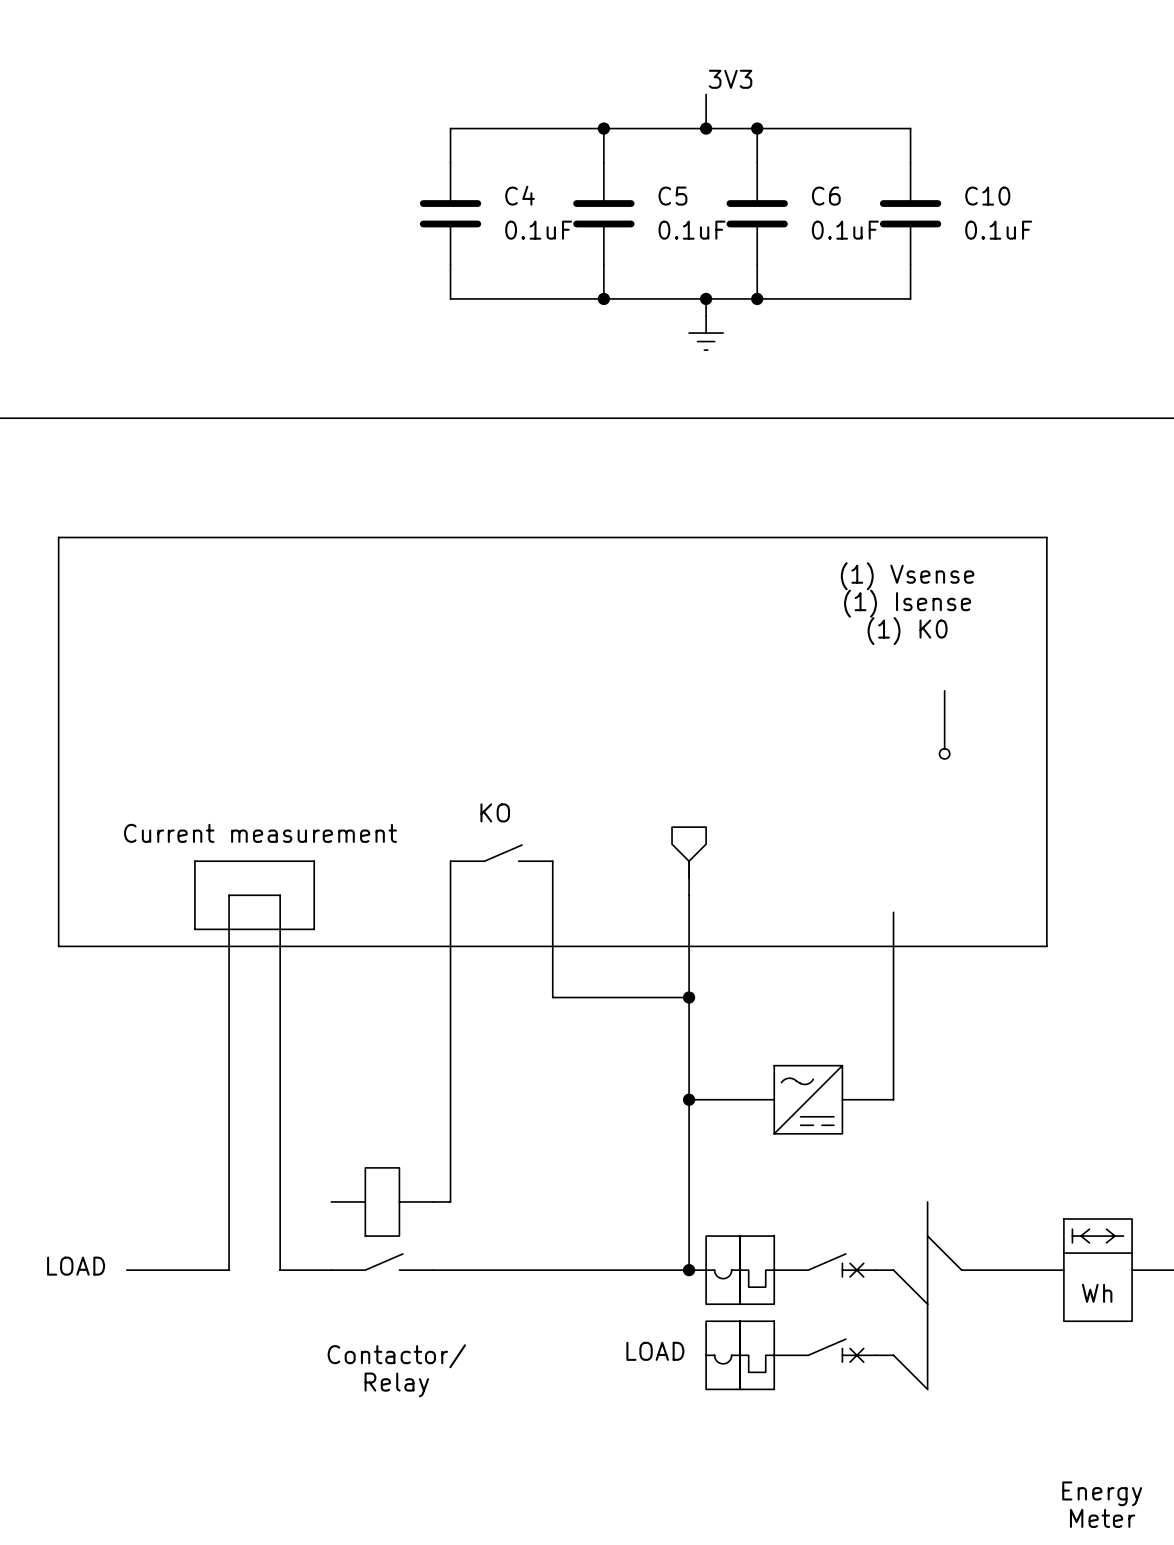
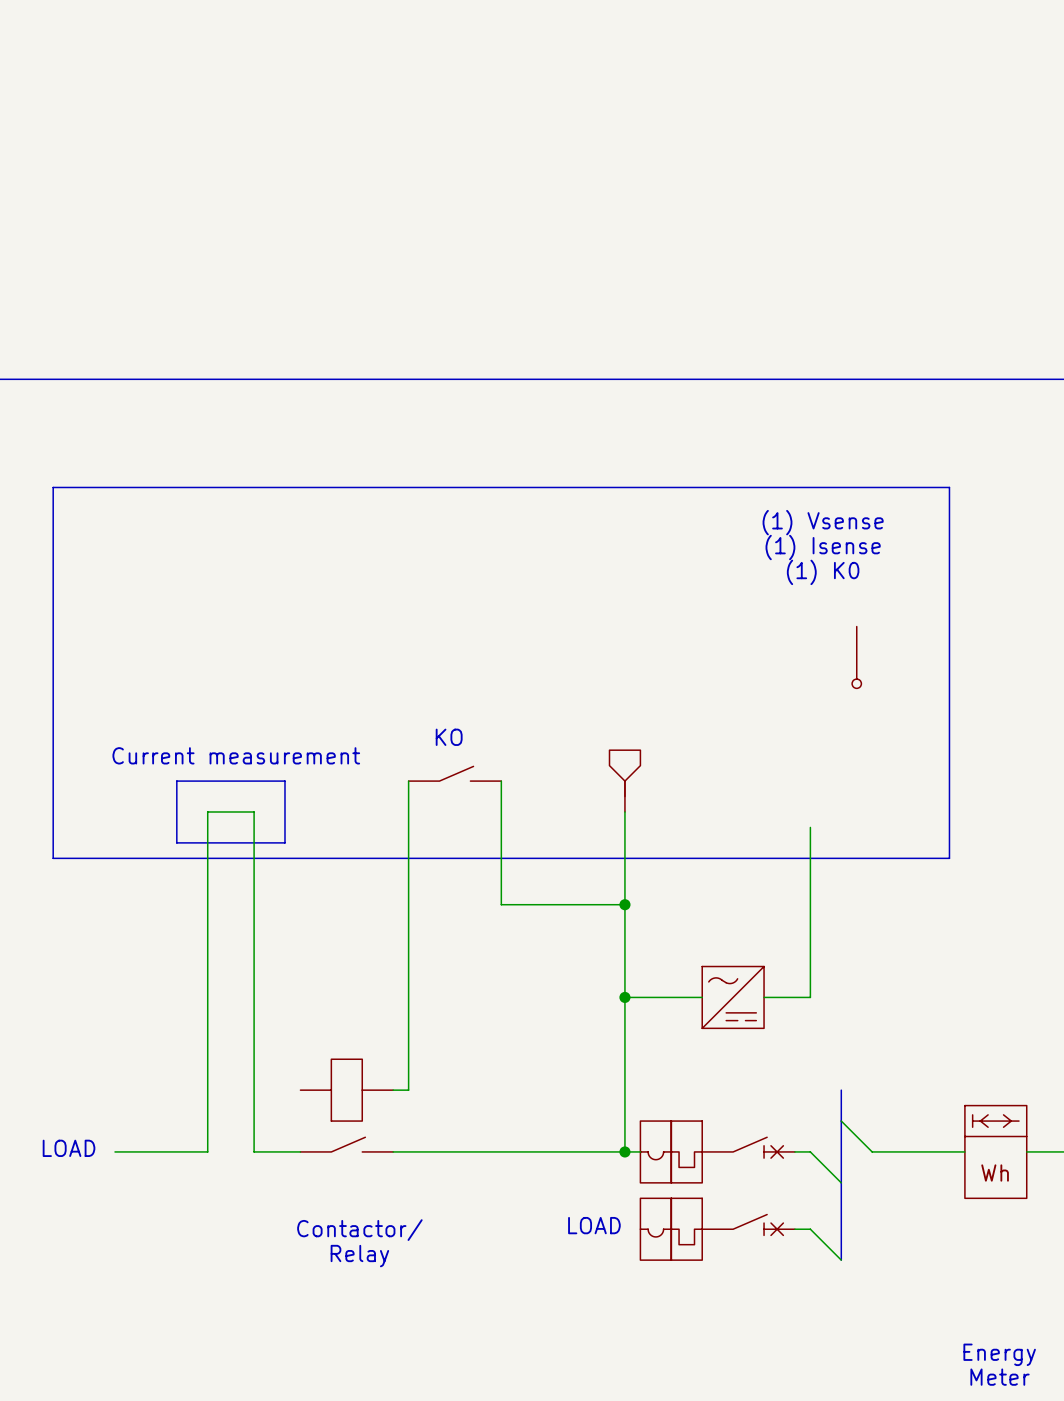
label: 3V3 (730, 79) -> none
wire: (706, 94) (706, 128) -> none
wire: (603, 128) (603, 162) -> none
junction: (603, 128) -> none
junction: (706, 128) -> none
wire: (757, 128) (757, 162) -> none
junction: (757, 128) -> none
wire: (450, 162) (450, 128) (910, 128) (910, 162) -> none
C4: 0.1uF (450, 213) -> none
C5: 0.1uF (603, 213) -> none
C6: 0.1uF (757, 213) -> none
C10: 0.1uF (910, 213) -> none
wire: (450, 264) (450, 298) (910, 298) (910, 264) -> none
wire: (603, 264) (603, 298) -> none
wire: (757, 264) (757, 298) -> none
junction: (603, 298) -> none
wire: (706, 298) (706, 315) -> none
junction: (706, 298) -> none
junction: (757, 298) -> none
power symbol: (706, 333) -> none

